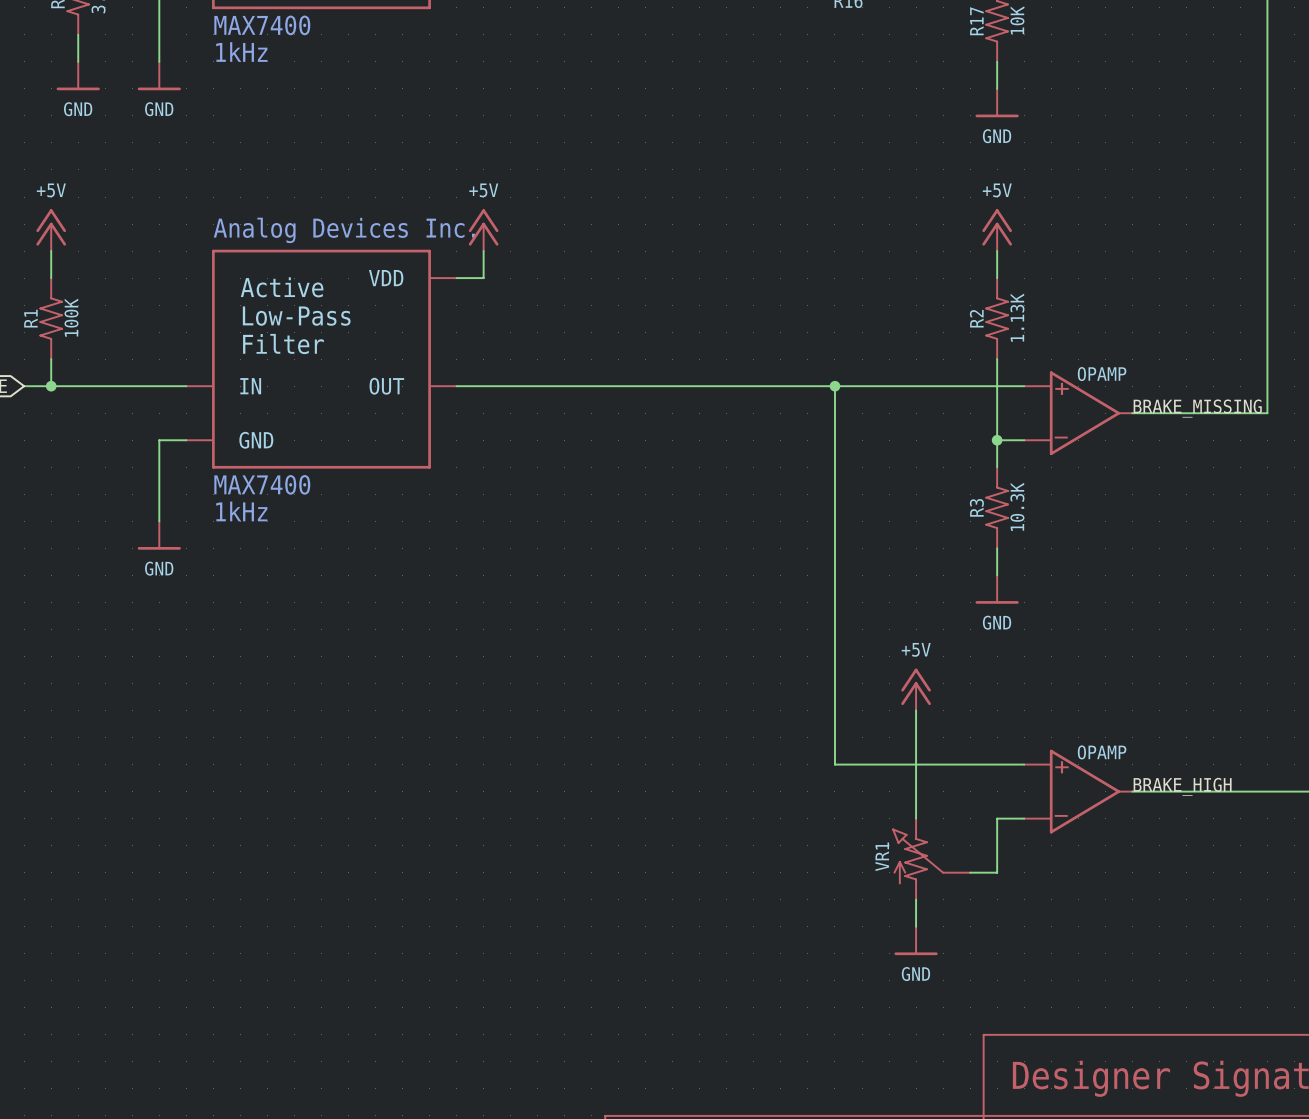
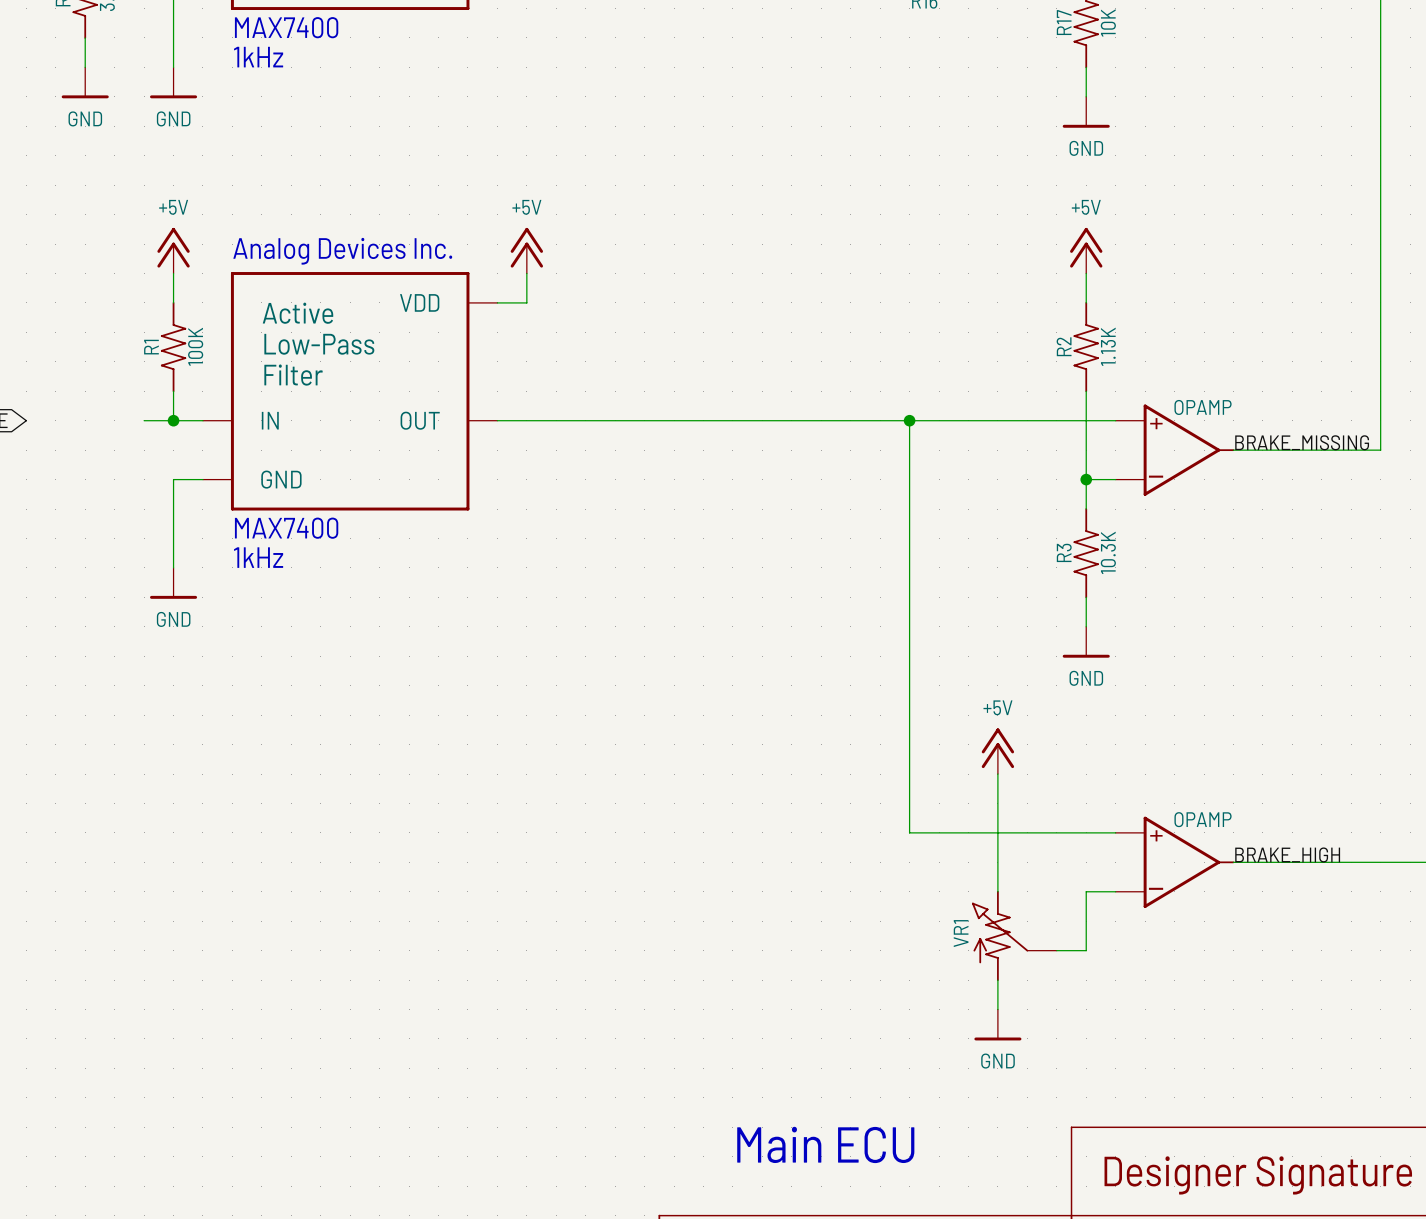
power symbol position: +5V (51, 230) -> +5V (173, 250)
wire: (51, 251) (51, 278) -> (173, 273) (173, 302)
R1 position: (51, 318) -> (173, 347)
wire: (51, 359) (51, 386) -> (173, 391) (173, 420)
wire: (24, 386) (132, 386) -> none
junction: (51, 386) -> none
junction: none -> (173, 420)
text: none -> Main ECU (825, 1144)

